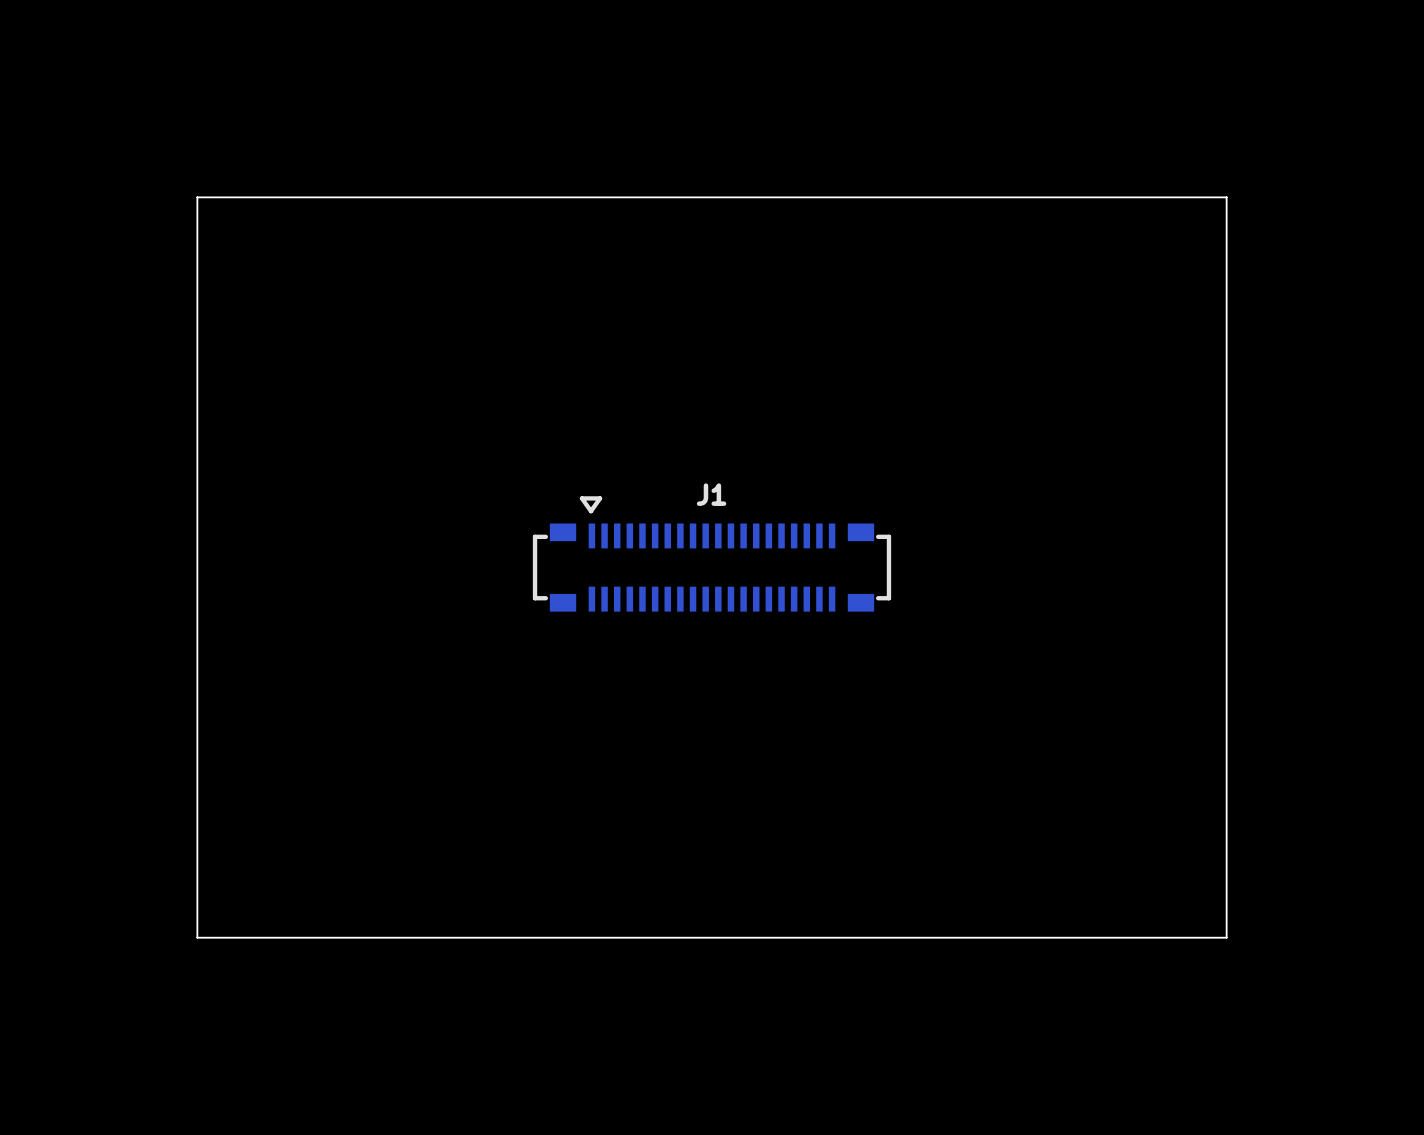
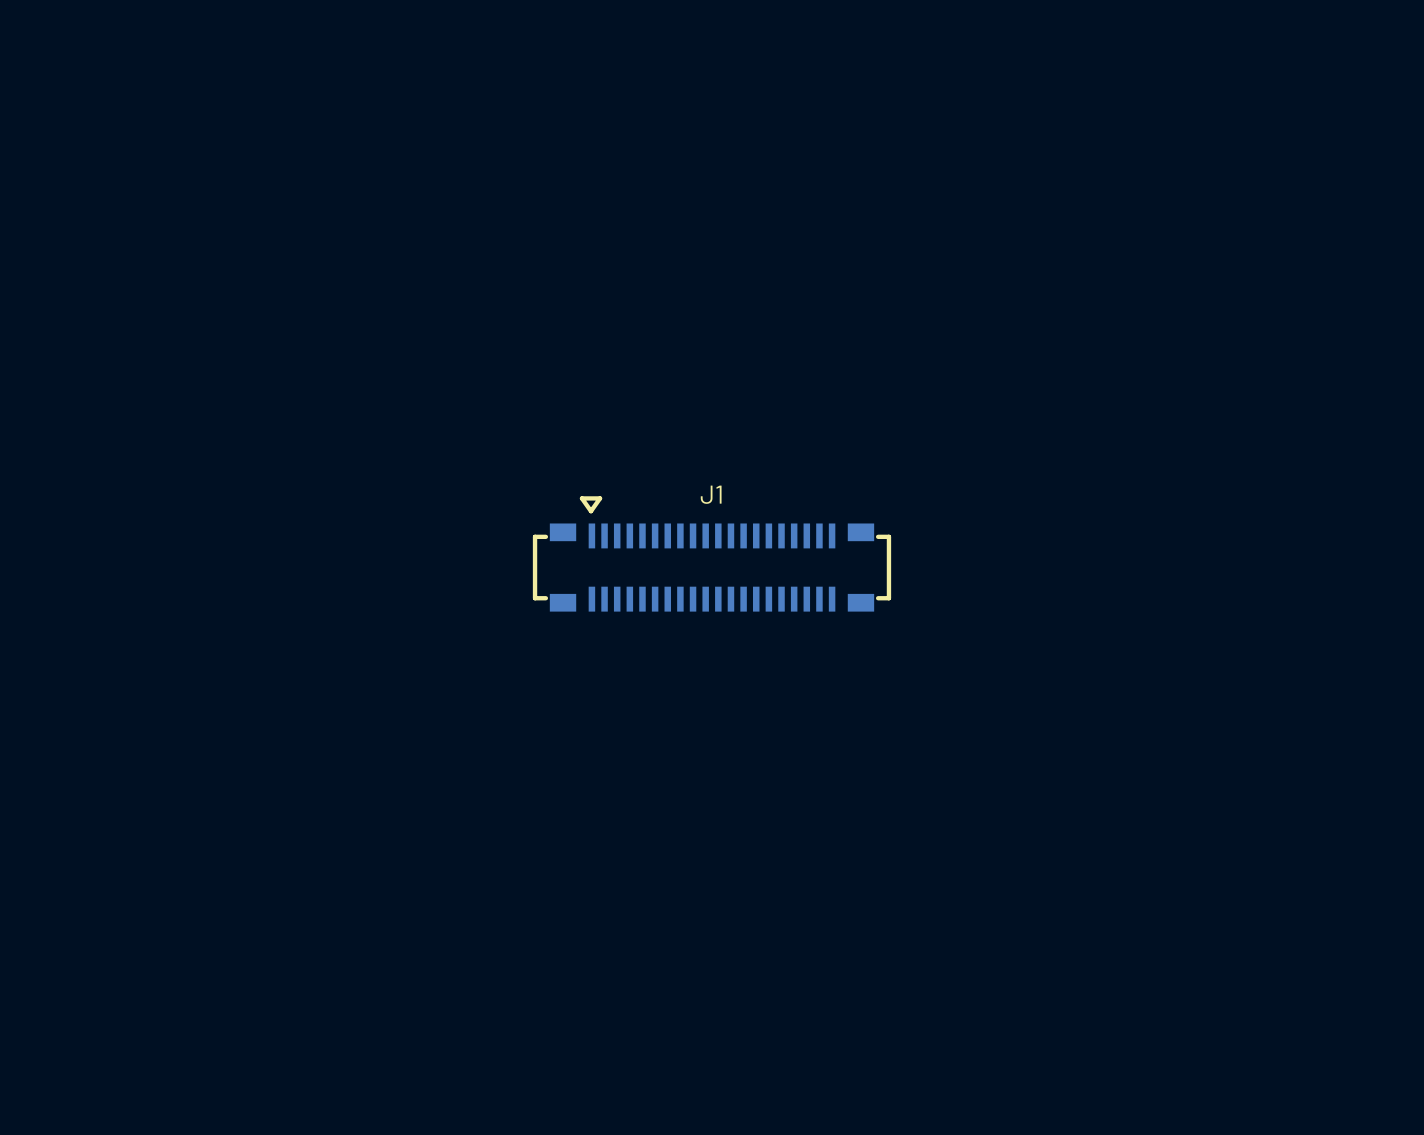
board edge: (1226, 197) (1226, 937) (197, 937) (197, 197) (1226, 197) -> none

